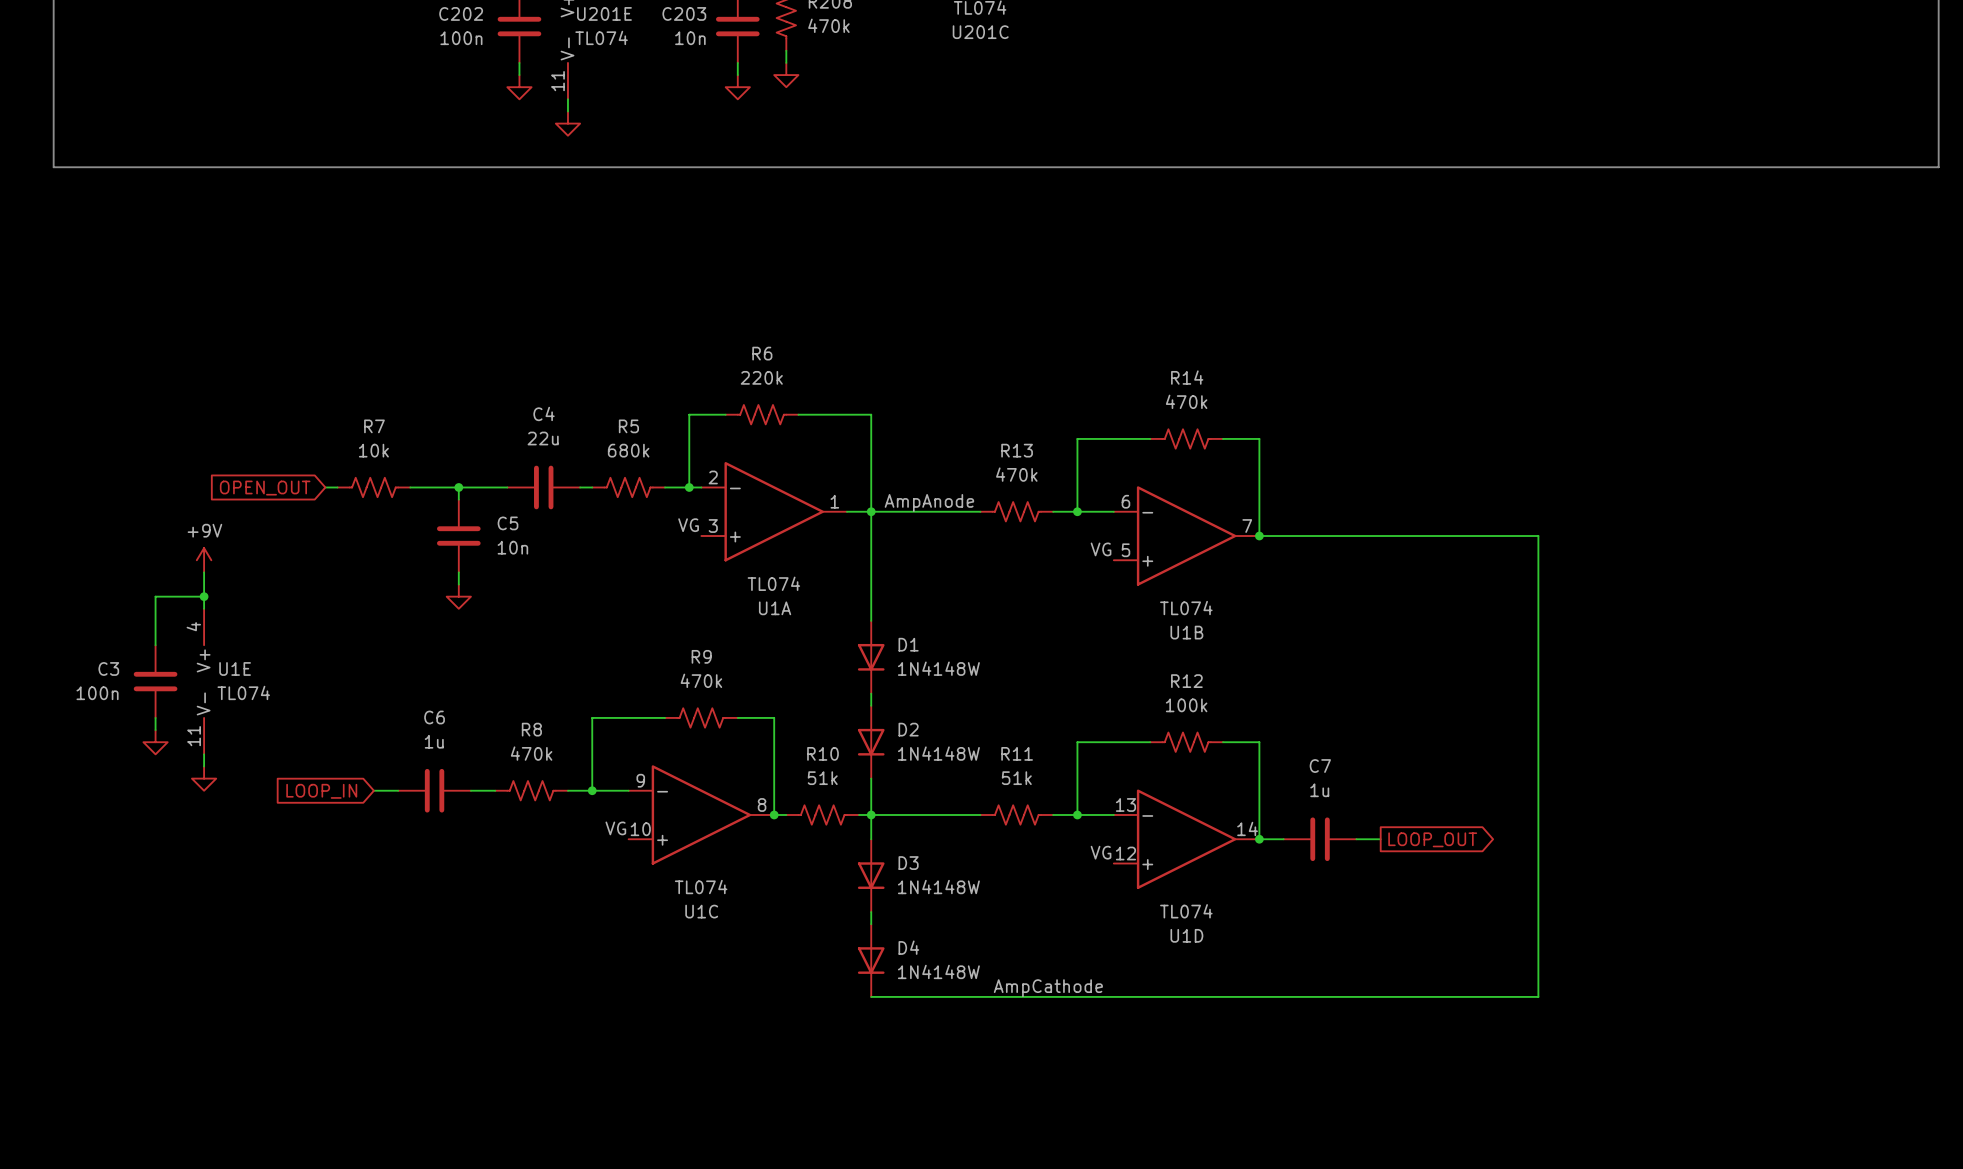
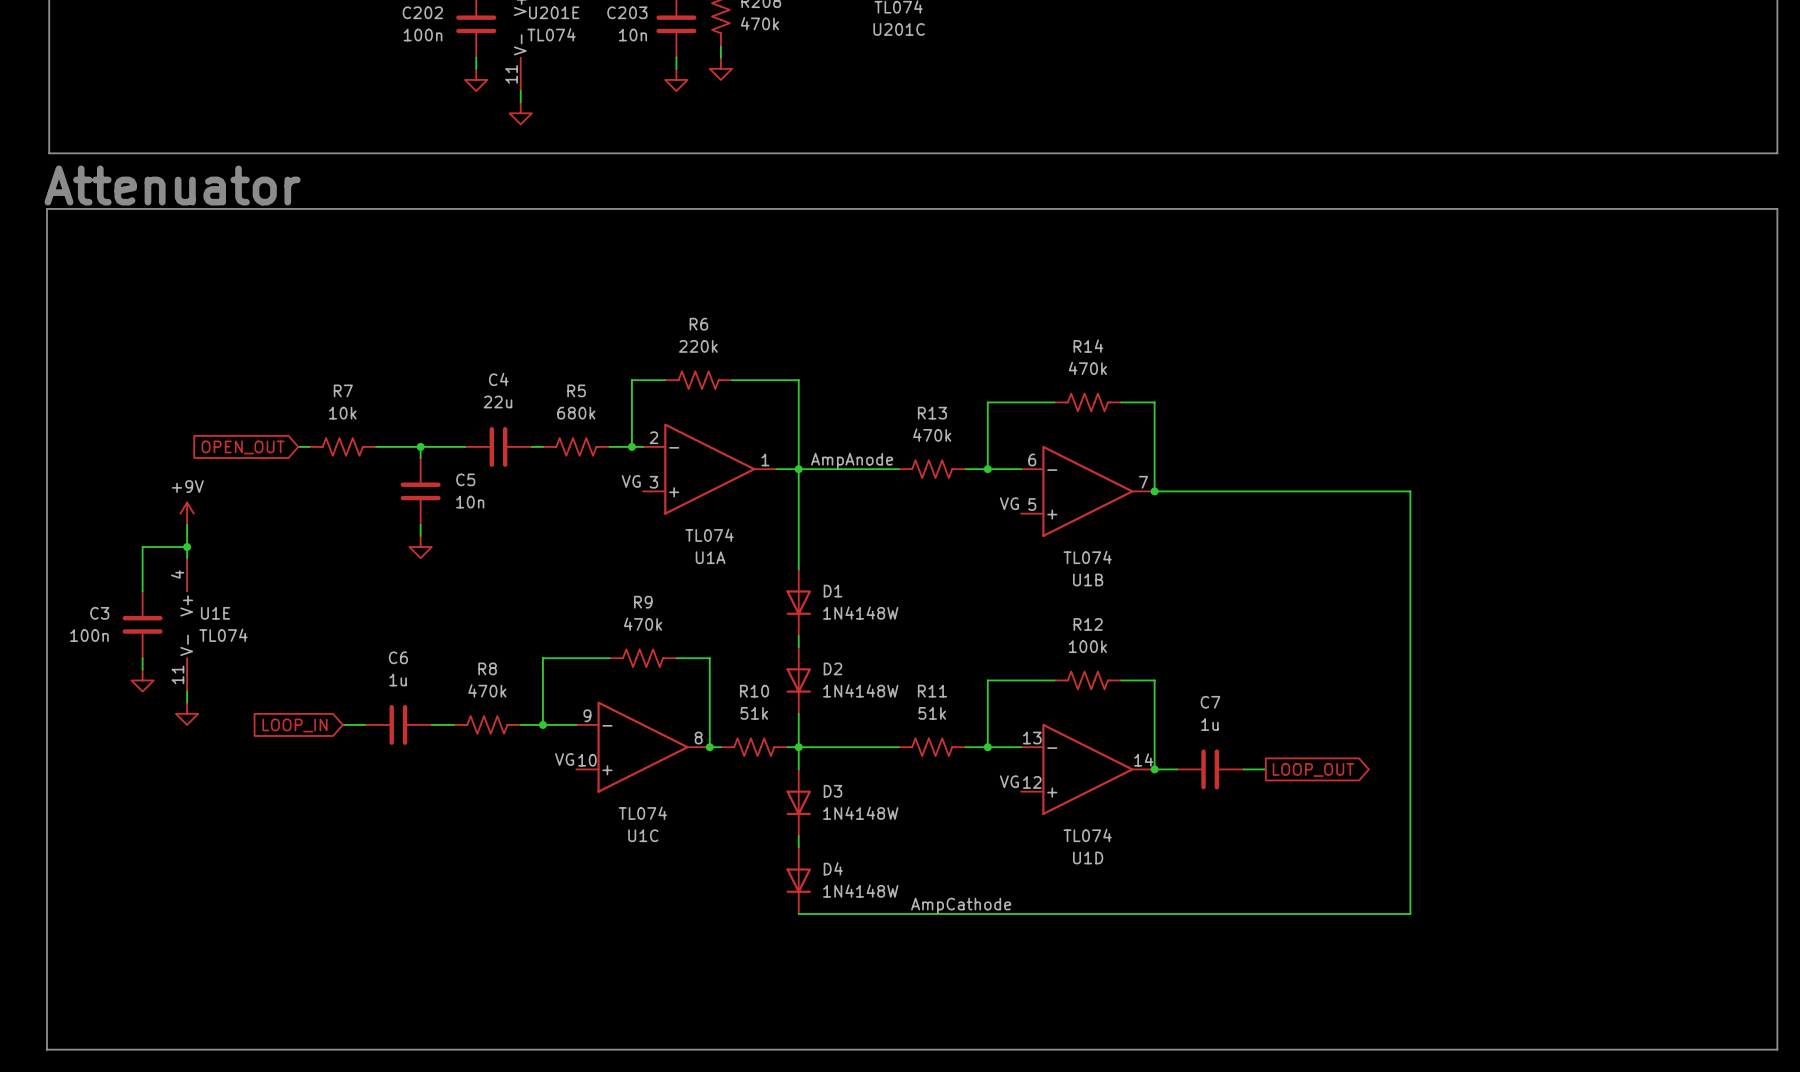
text: none -> Attenuator (172, 185)
line: none -> (46, 208) (1777, 208) (1777, 1049) (46, 1049) (46, 208)

